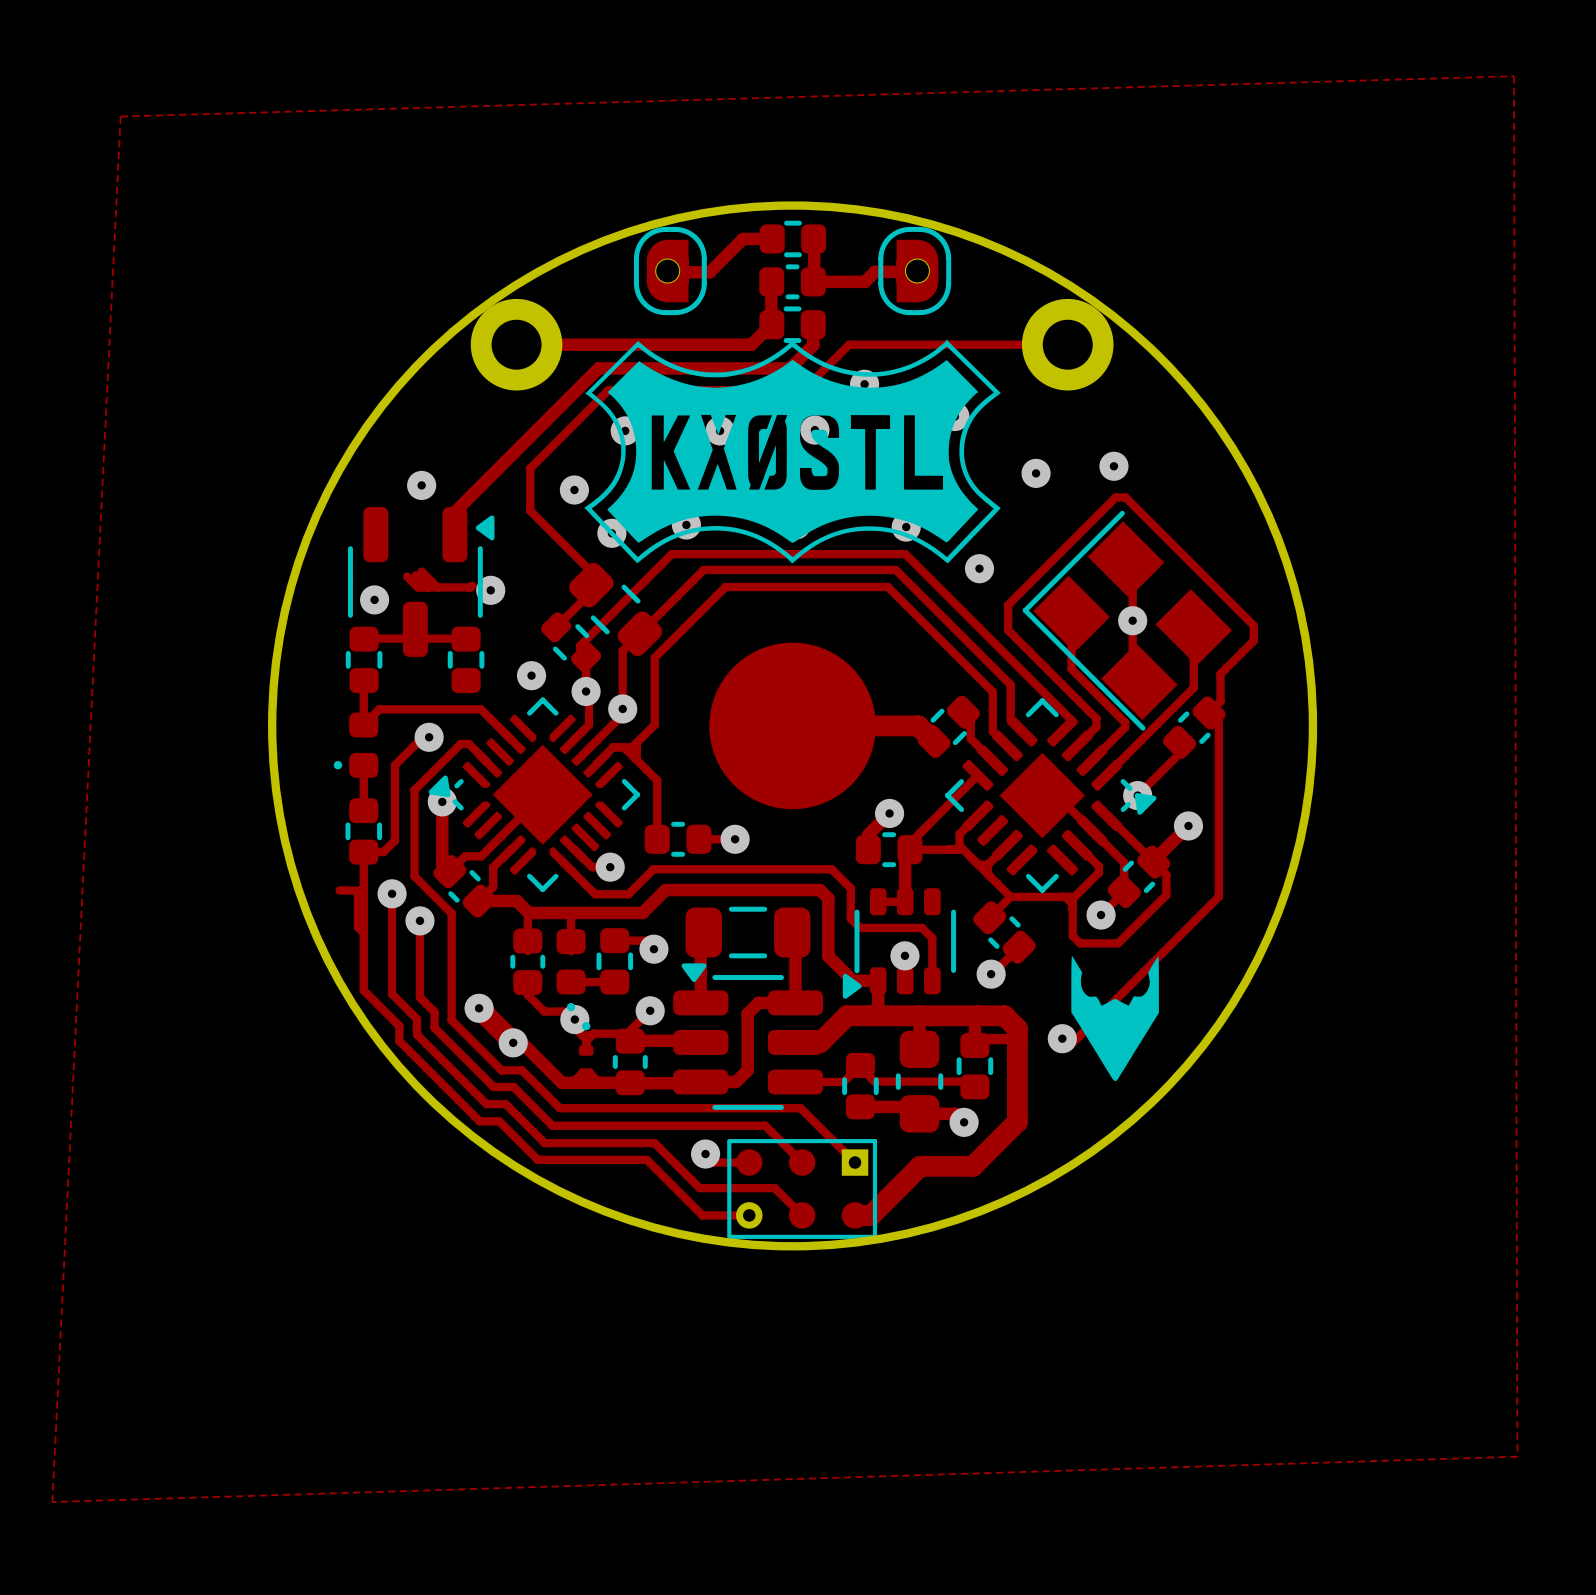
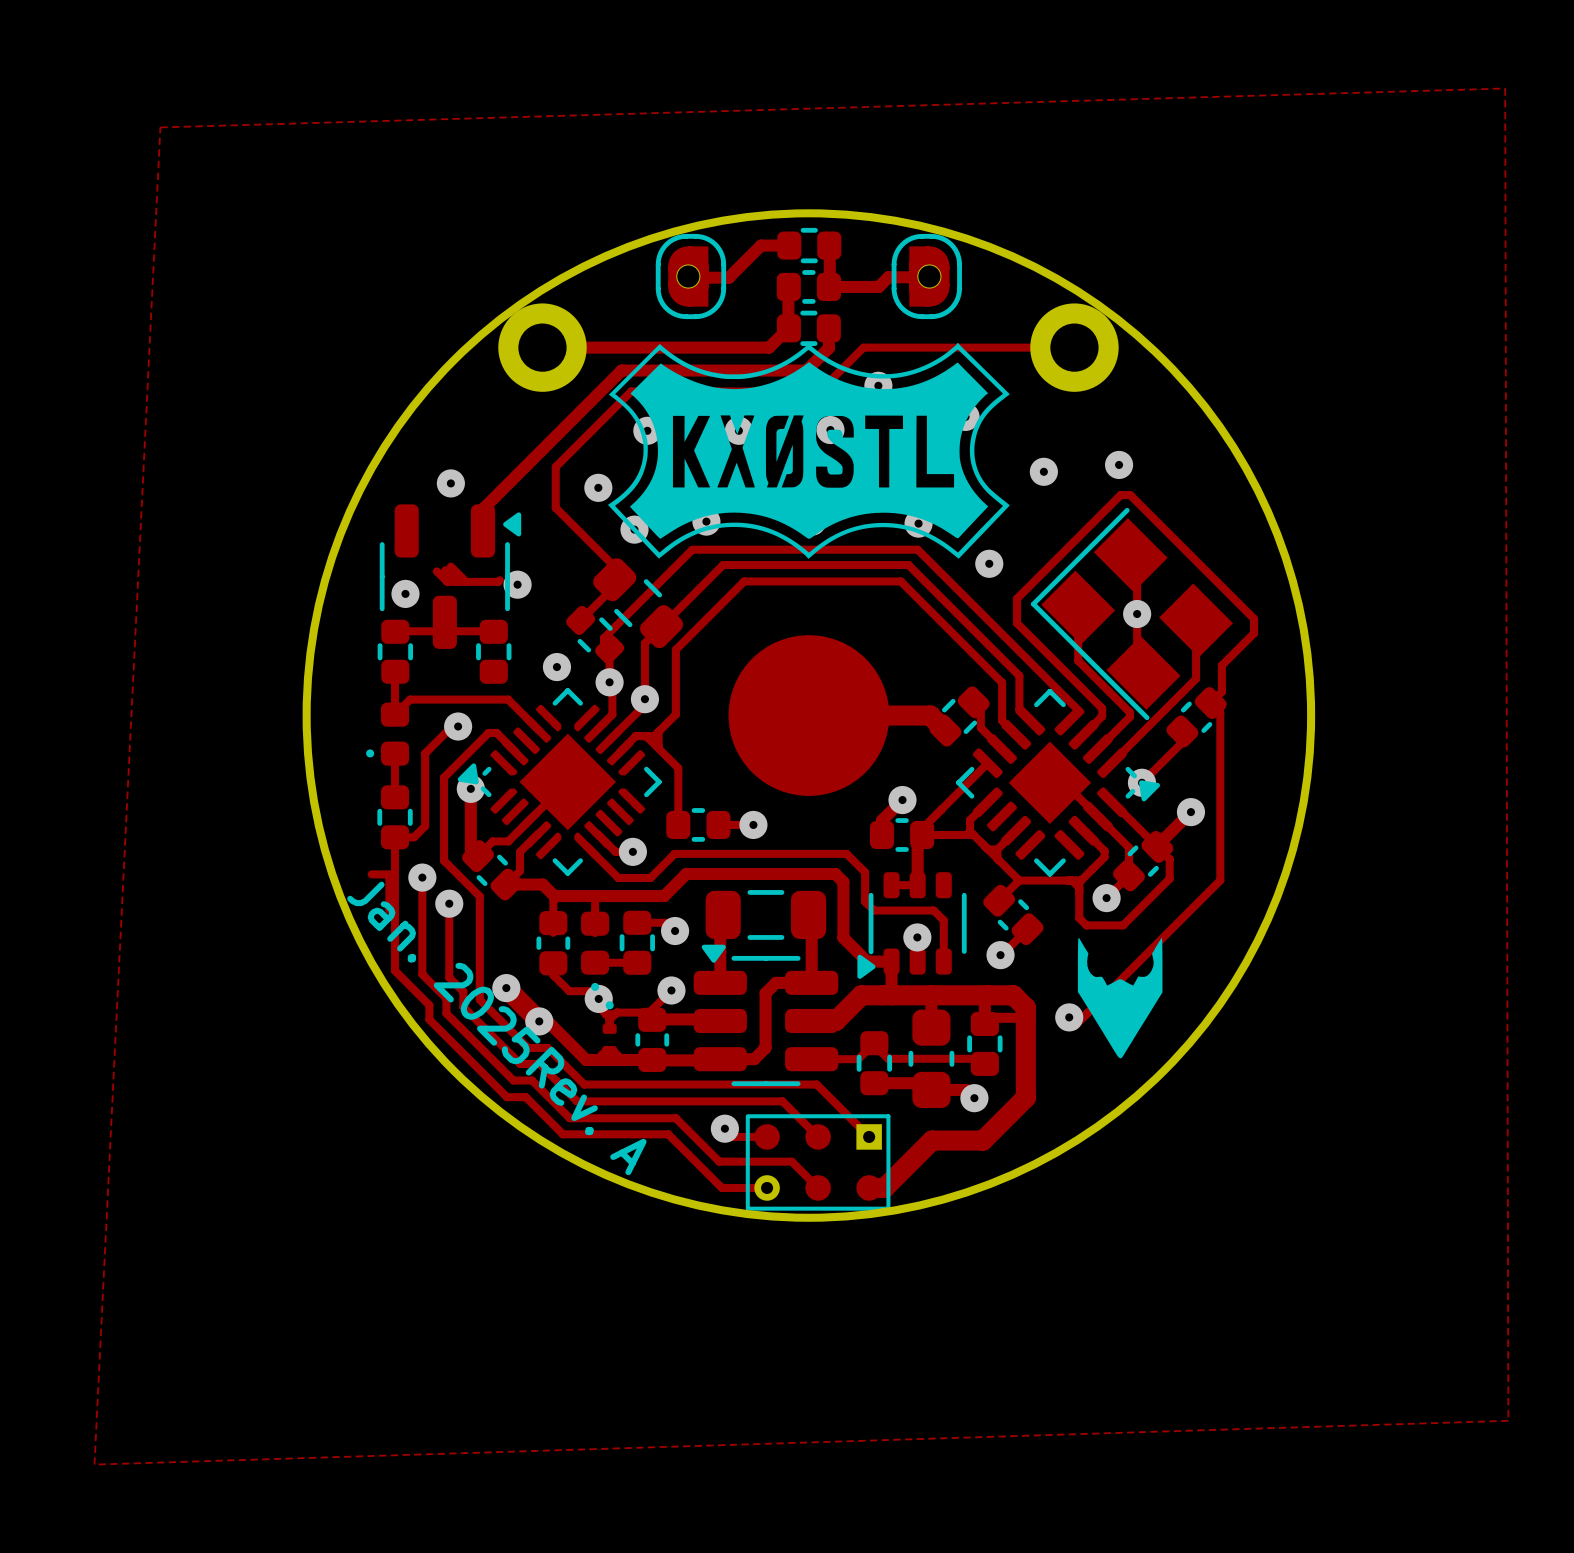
text: none -> Jan. 2025 (443, 972)
text: none -> Rev. A (586, 1110)

